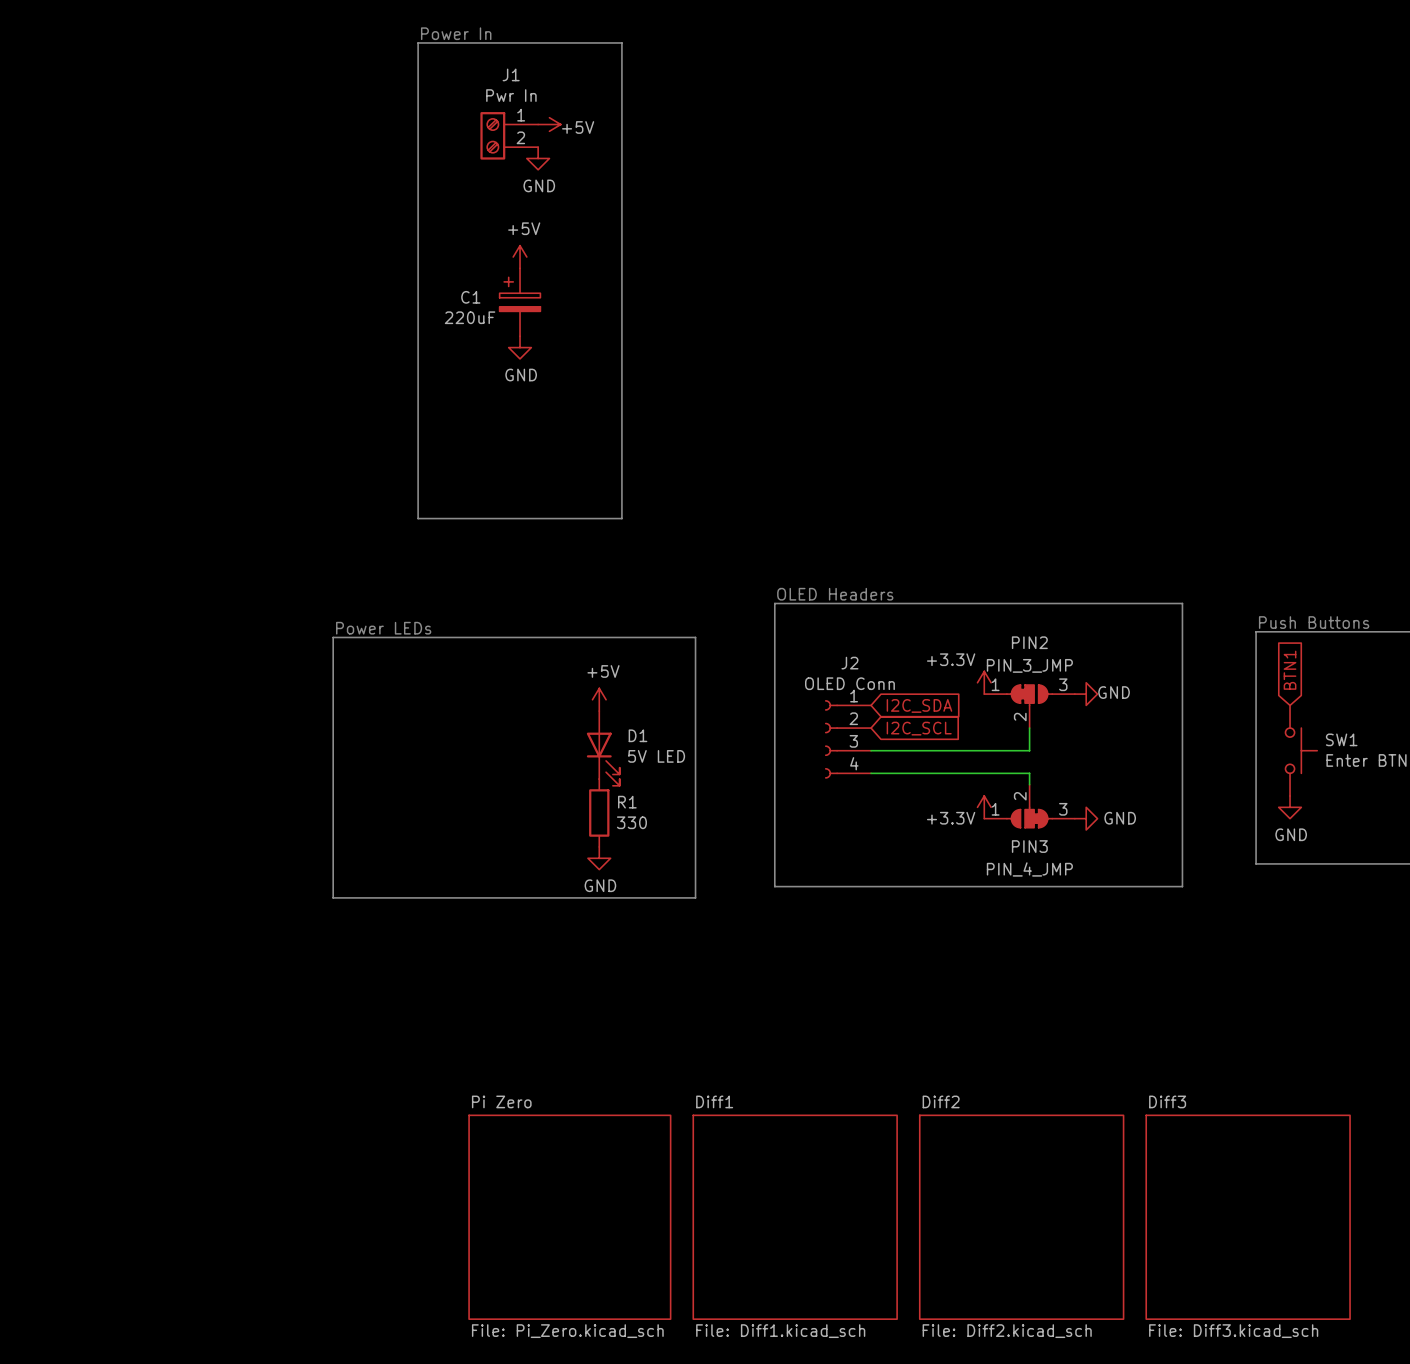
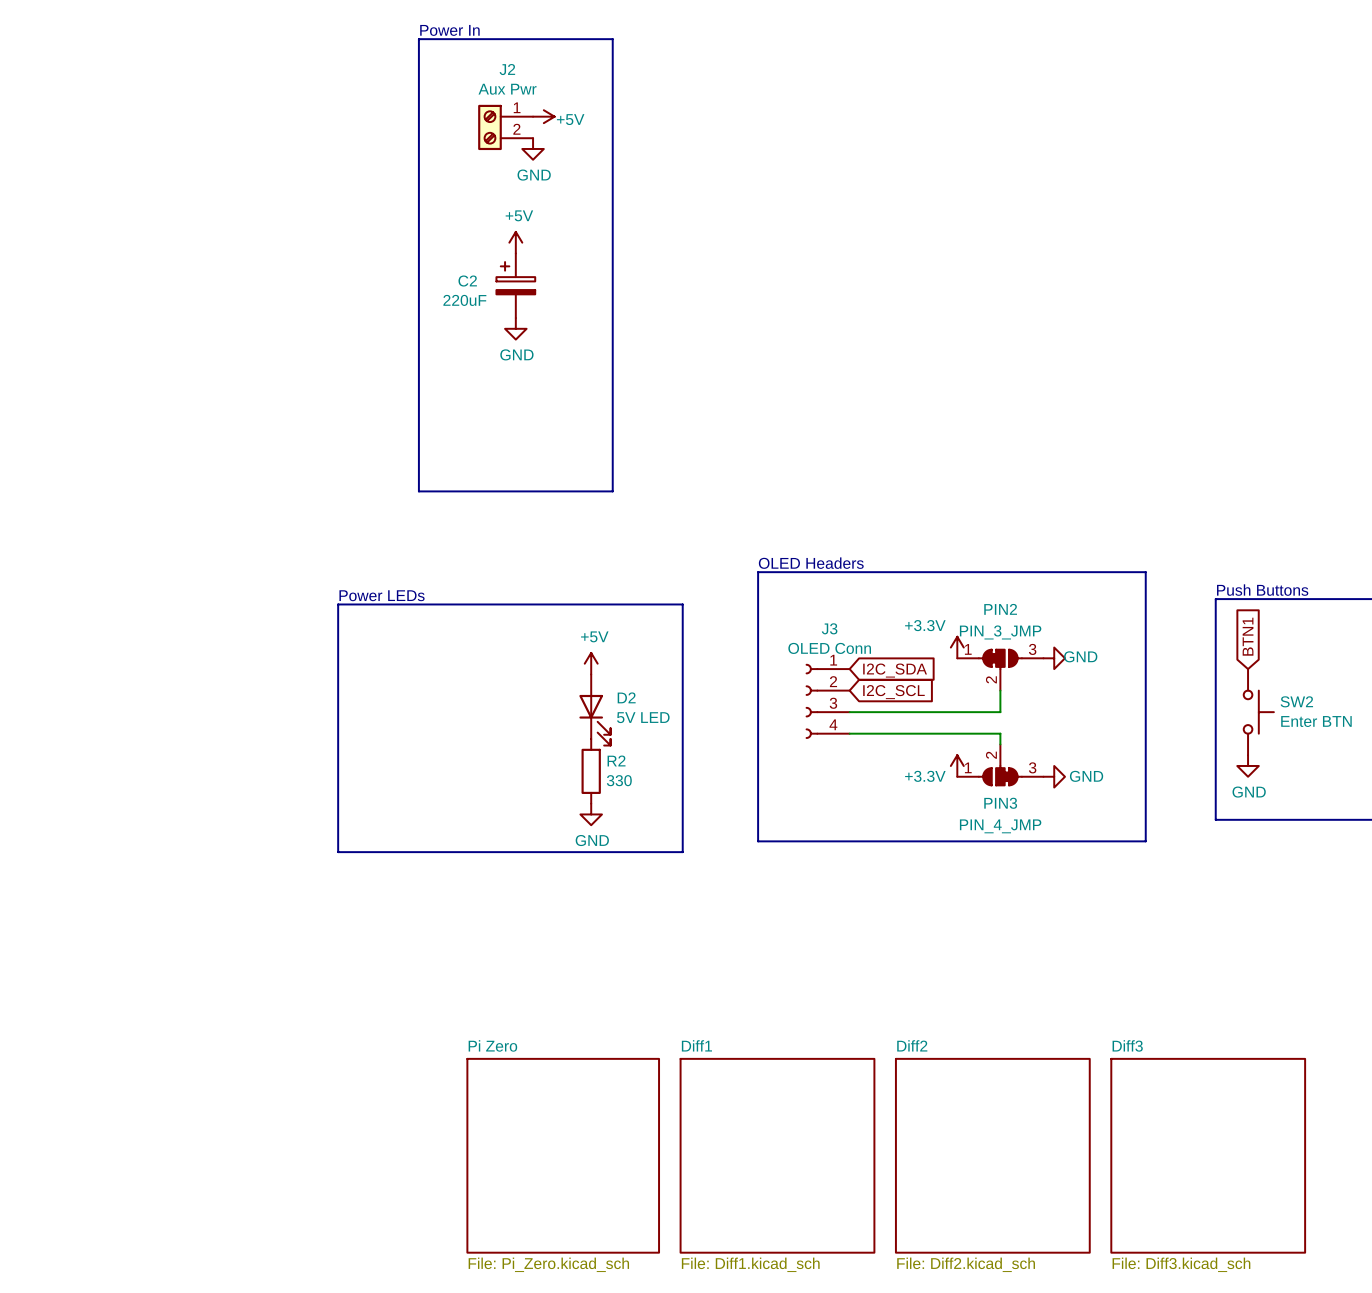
J1 name: J1 (511, 74) -> J2 (507, 69)
J1 value: Pwr In (511, 95) -> Aux Pwr (507, 89)
C1 name: C1 (470, 297) -> C2 (467, 281)
J2 name: J2 (849, 663) -> J3 (829, 628)
D1 name: D1 (638, 735) -> D2 (626, 697)
SW1 name: SW1 (1341, 739) -> SW2 (1296, 701)
R1 name: R1 (627, 802) -> R2 (616, 760)

